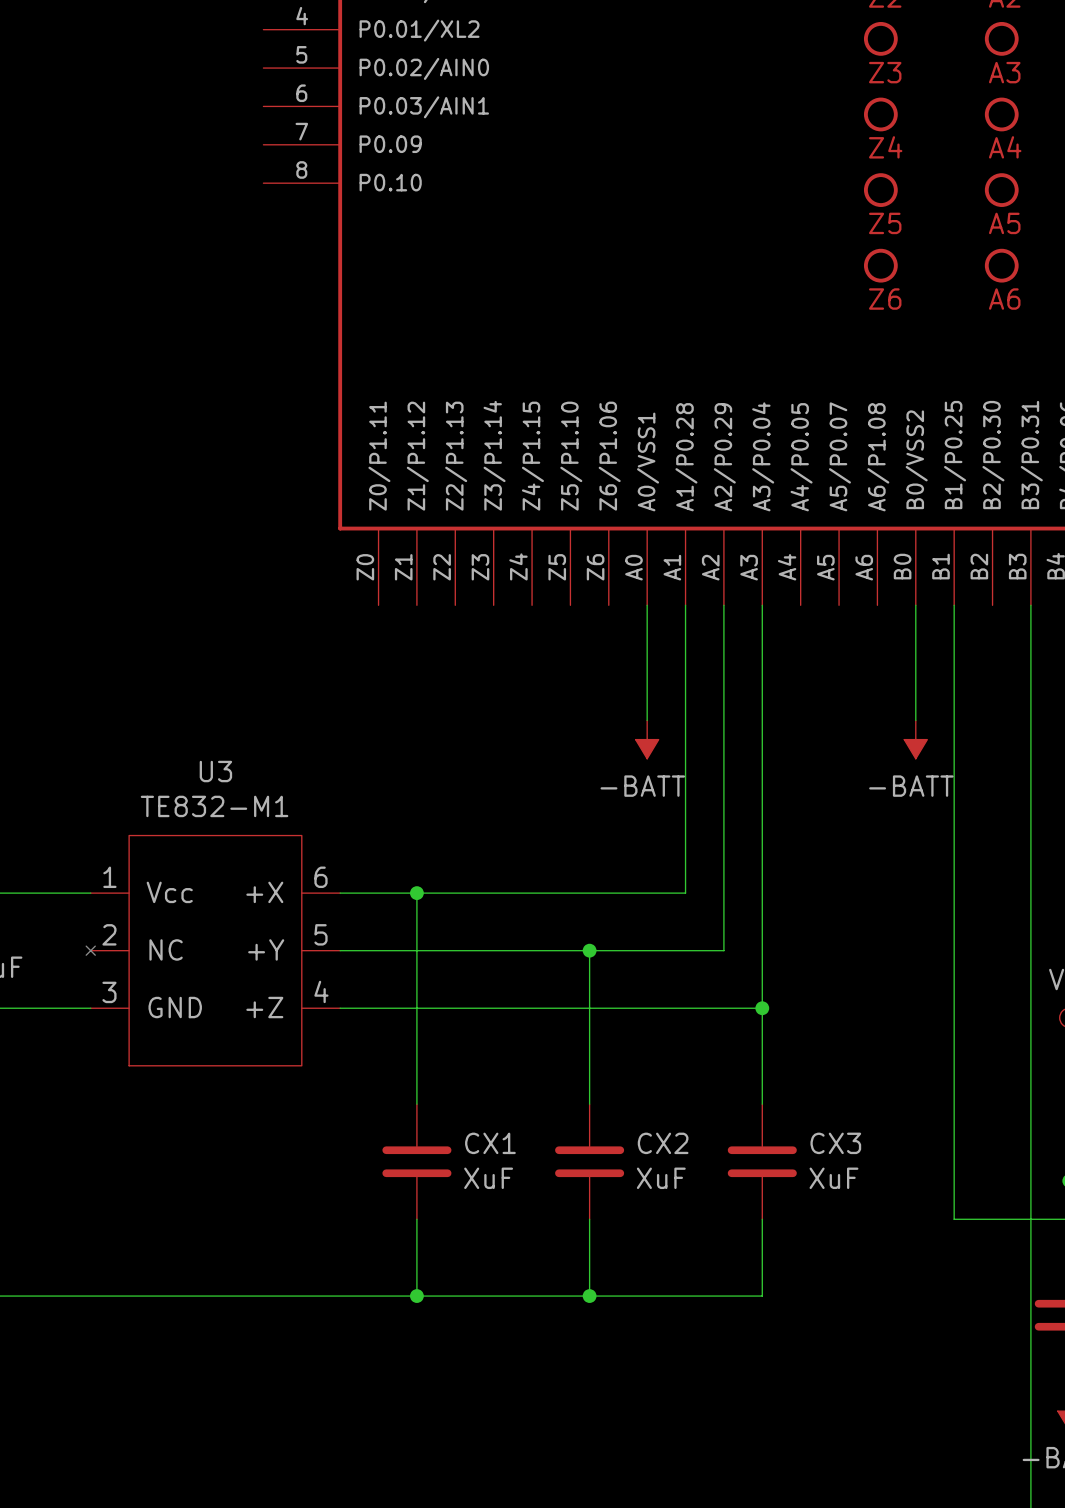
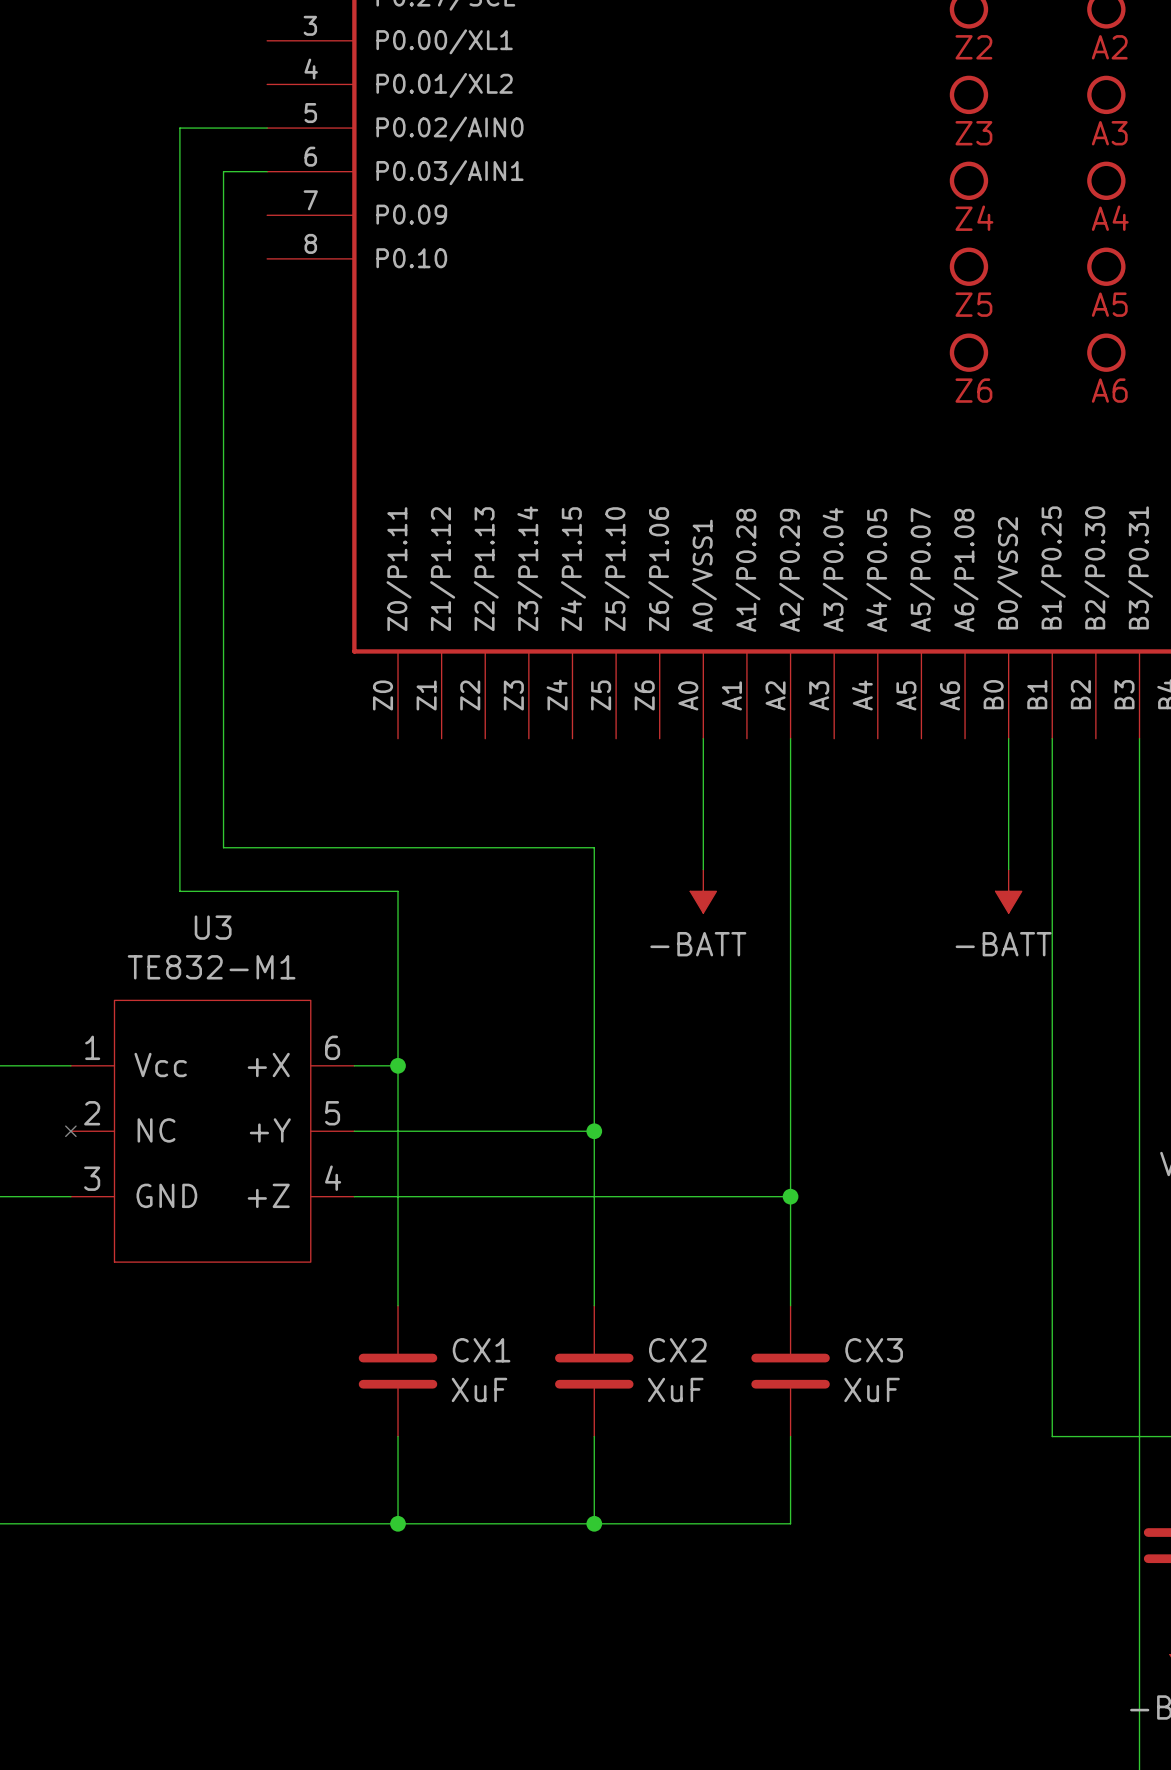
wire: none -> (267, 128) (179, 128) (179, 891) (398, 891) (398, 1305)
wire: none -> (267, 171) (223, 171) (223, 847) (594, 847) (594, 1305)
wire: (685, 605) (685, 893) (378, 893) -> none
wire: (762, 605) (762, 1104) -> none
wire: (416, 893) (416, 1104) -> none
junction position: (416, 893) -> (398, 1065)
wire: (551, 950) (723, 950) -> (790, 1305) (790, 1131)
wire: (589, 950) (589, 1104) -> none
junction position: (589, 950) -> (594, 1131)
wire: (723, 1008) (762, 1008) -> none
junction position: (762, 1008) -> (790, 1196)
CX1 position: (416, 1161) -> (398, 1371)
CX2 position: (589, 1161) -> (594, 1371)
CX3 position: (762, 1161) -> (790, 1371)
wire: (416, 1219) (416, 1296) -> (594, 1436) (594, 1523)
wire: (589, 1219) (589, 1296) -> (398, 1436) (398, 1523)
wire: (762, 1219) (762, 1296) (723, 1296) -> (790, 1436) (790, 1523)
junction position: (416, 1296) -> (398, 1523)
junction position: (589, 1296) -> (594, 1523)

